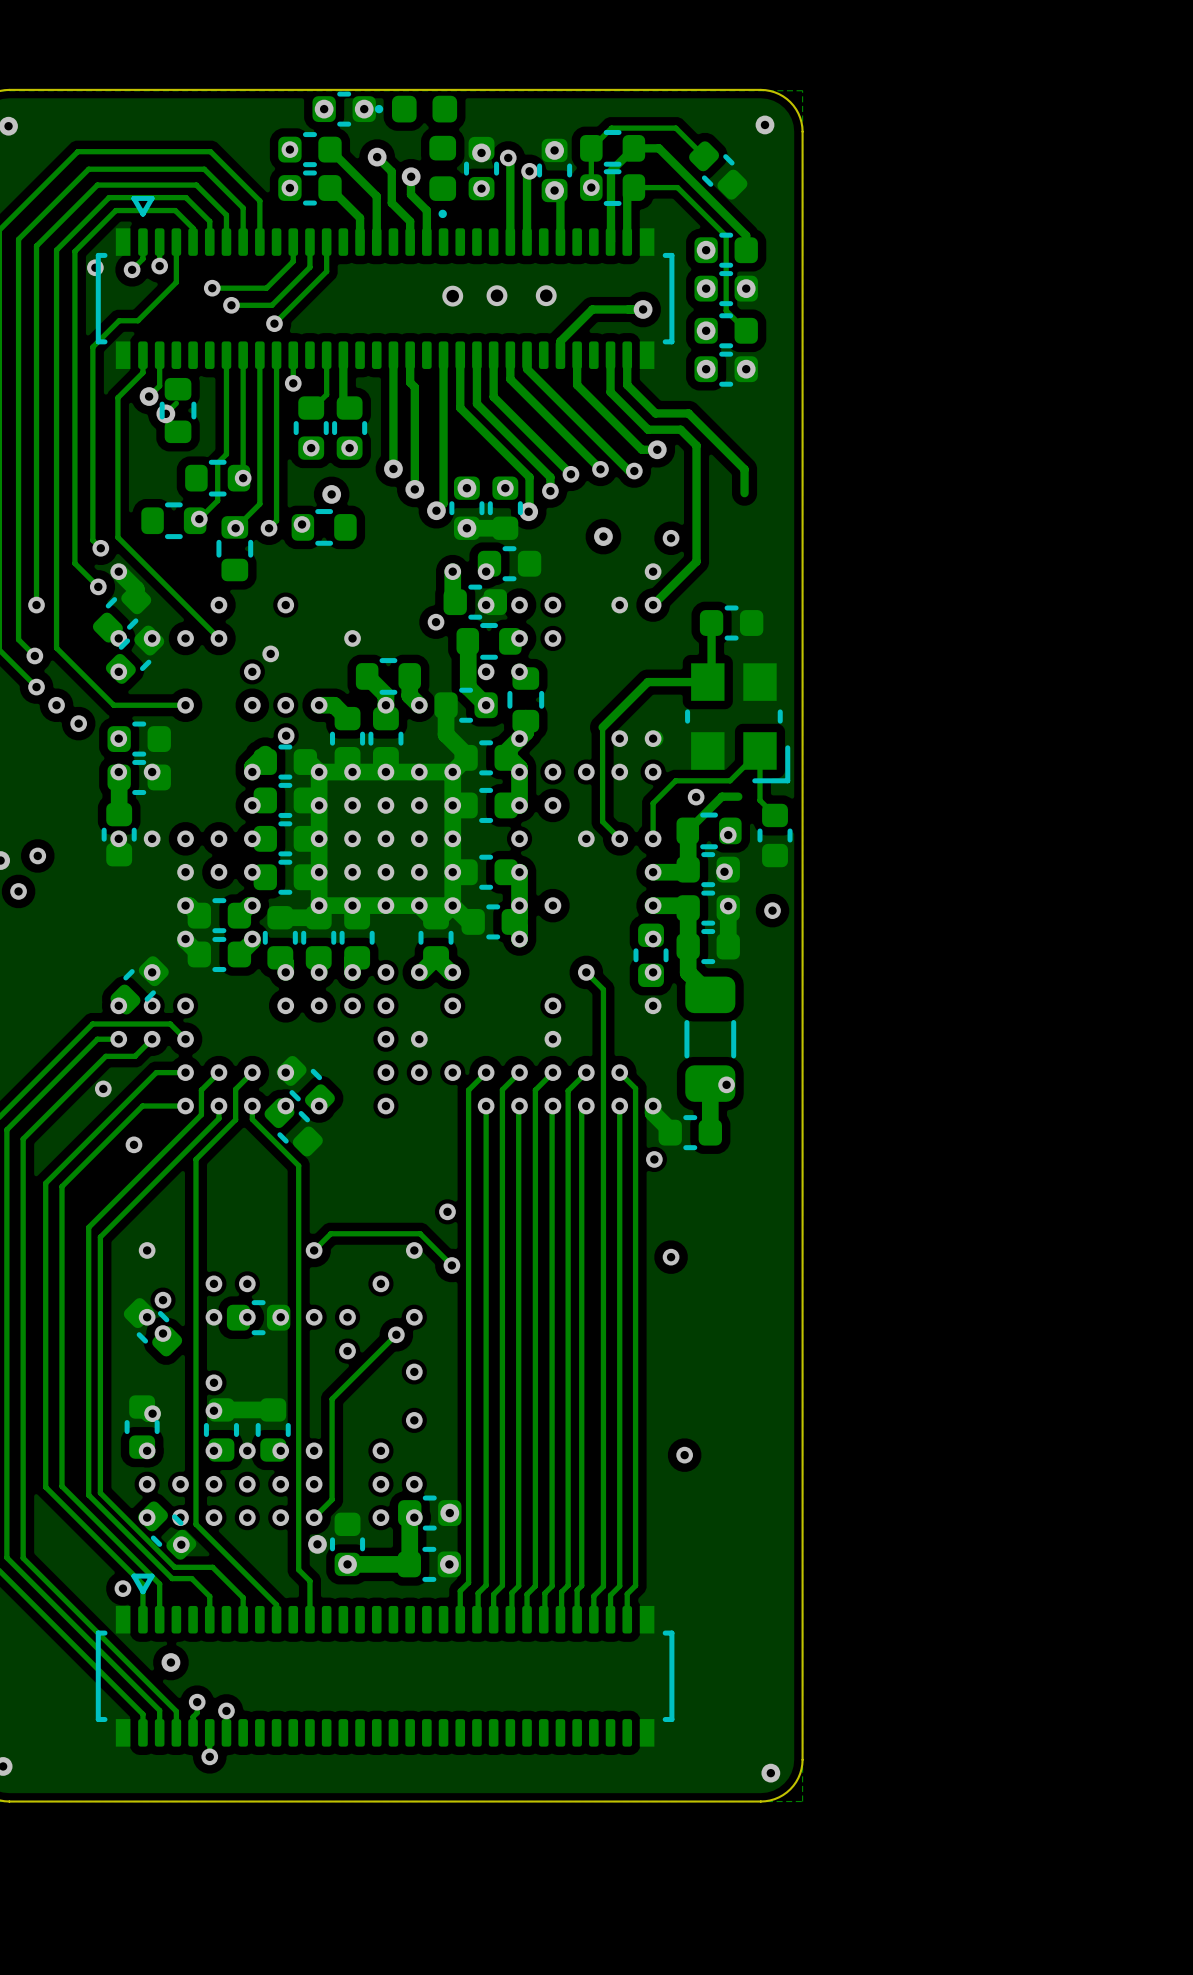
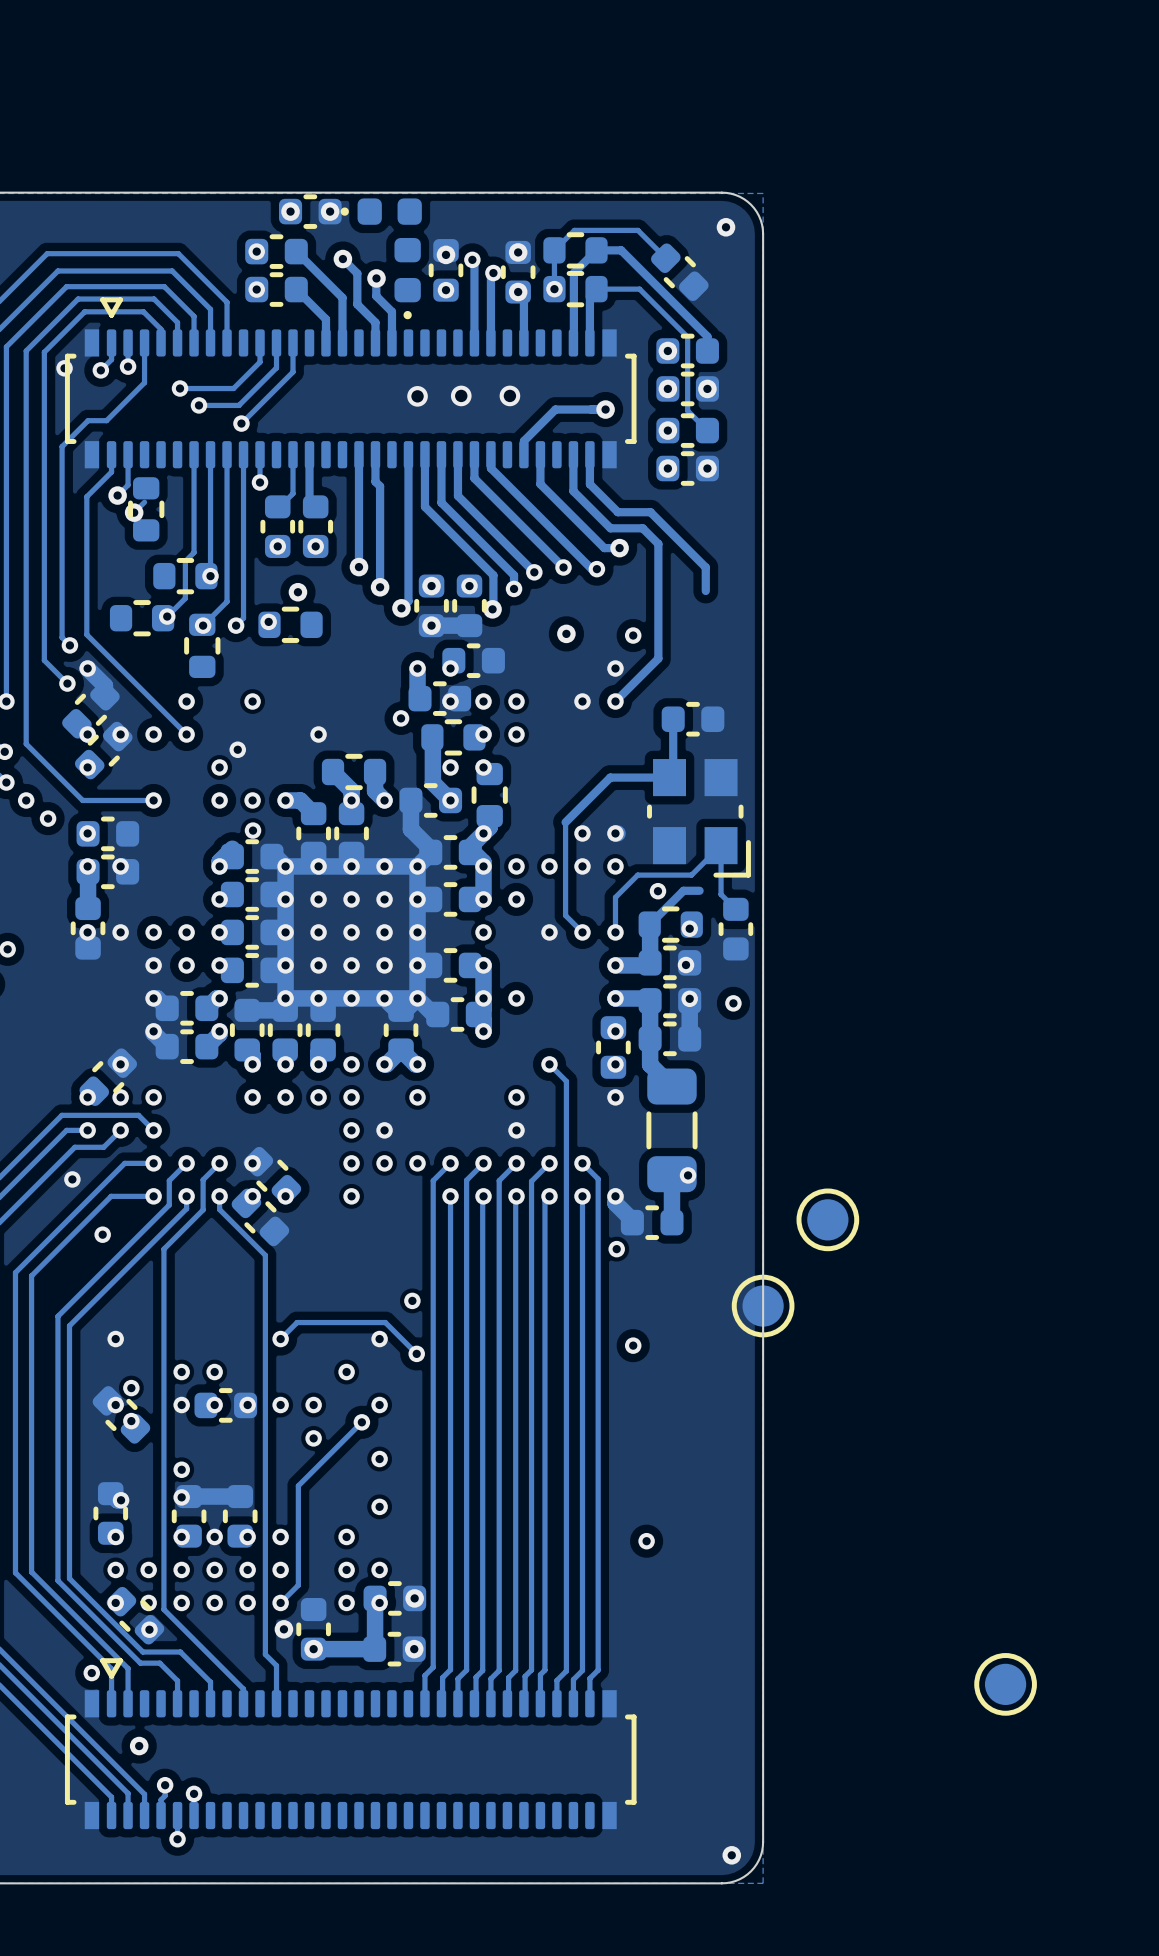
part: none -> (827, 1219)
part: none -> (763, 1306)
part: none -> (1005, 1684)

